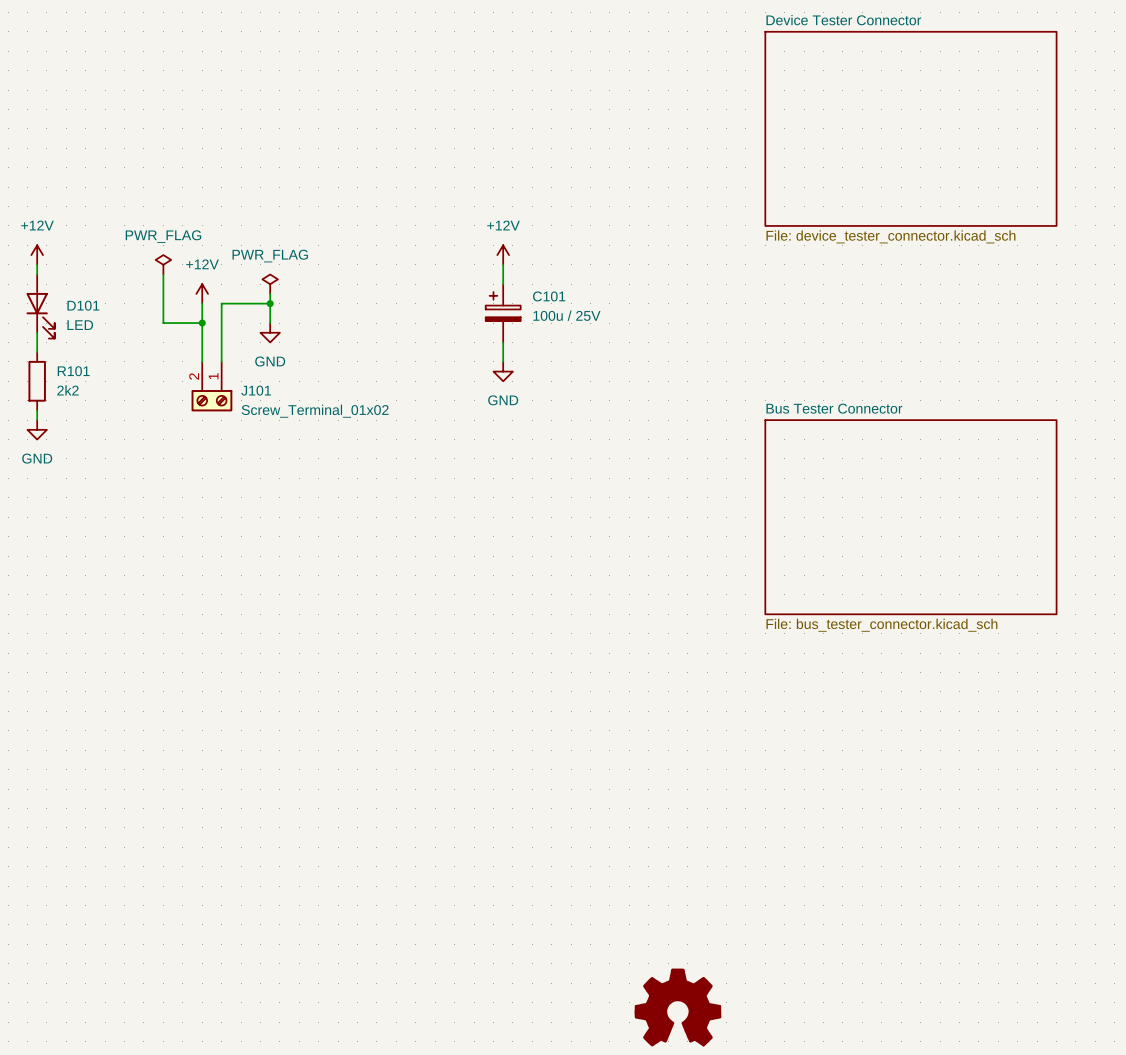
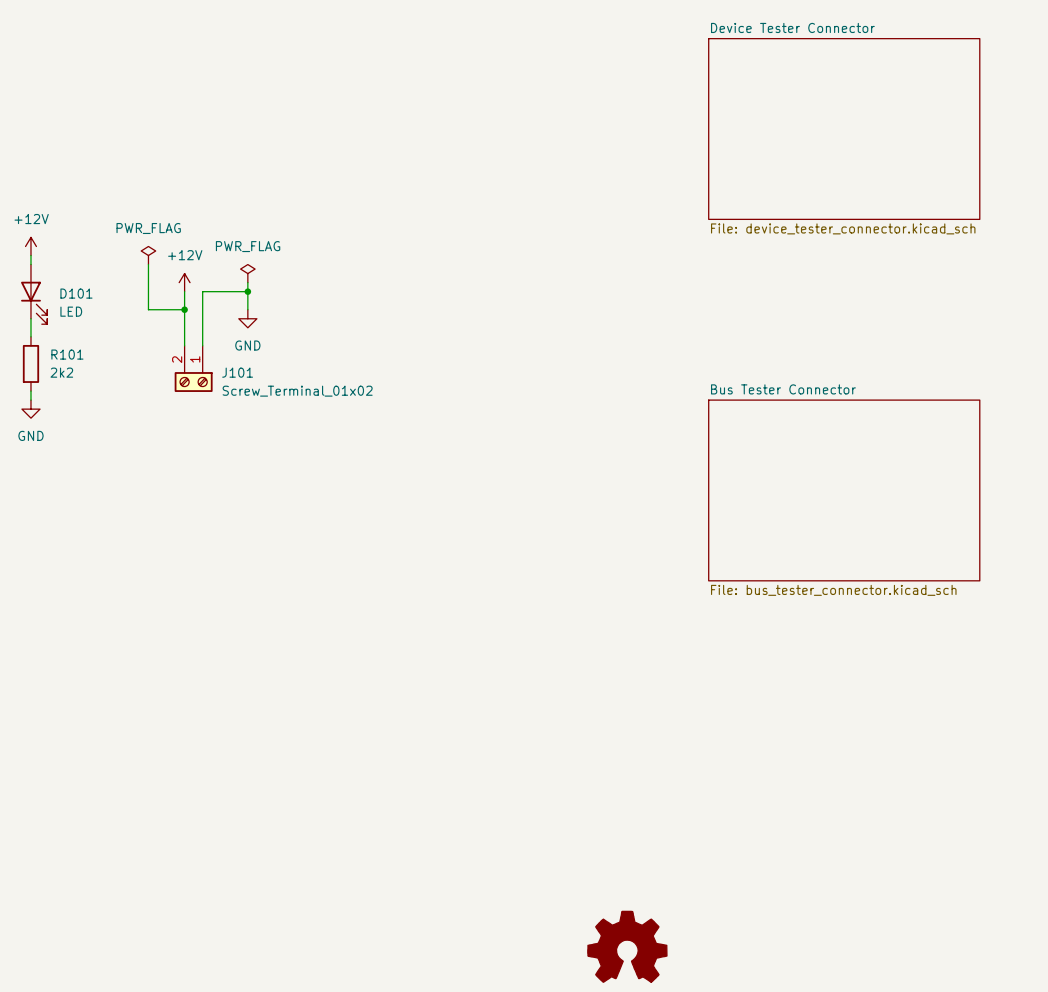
power symbol: +12V (503, 255) -> none
wire: (503, 264) (503, 284) -> none
C101: 100u / 25V (503, 313) -> none
wire: (503, 342) (503, 361) -> none
power symbol: GND (503, 371) -> none

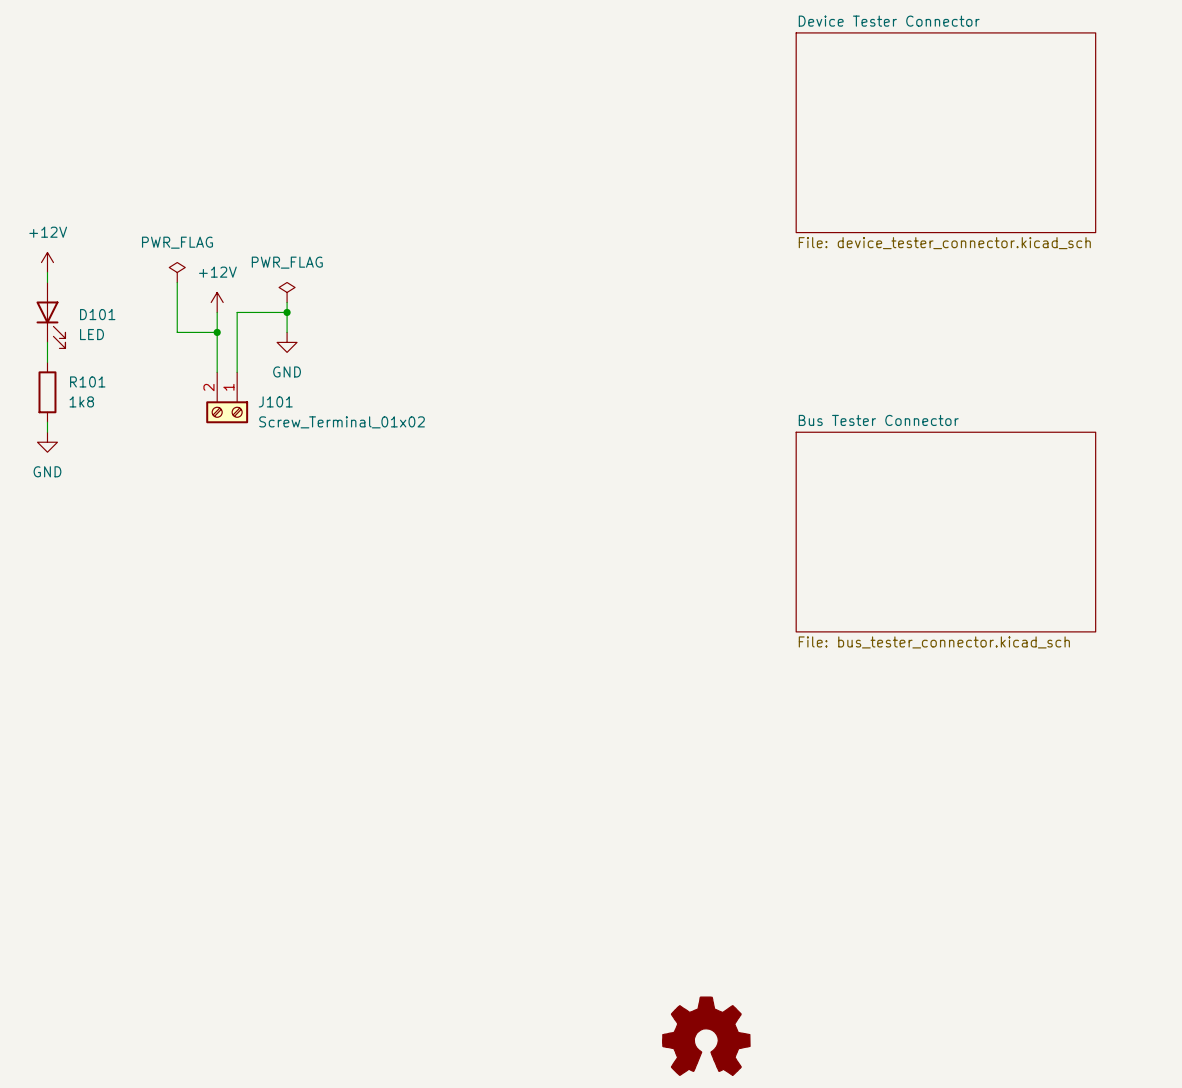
R101 value: 2k2 (61, 372) -> 1k8 (81, 401)

